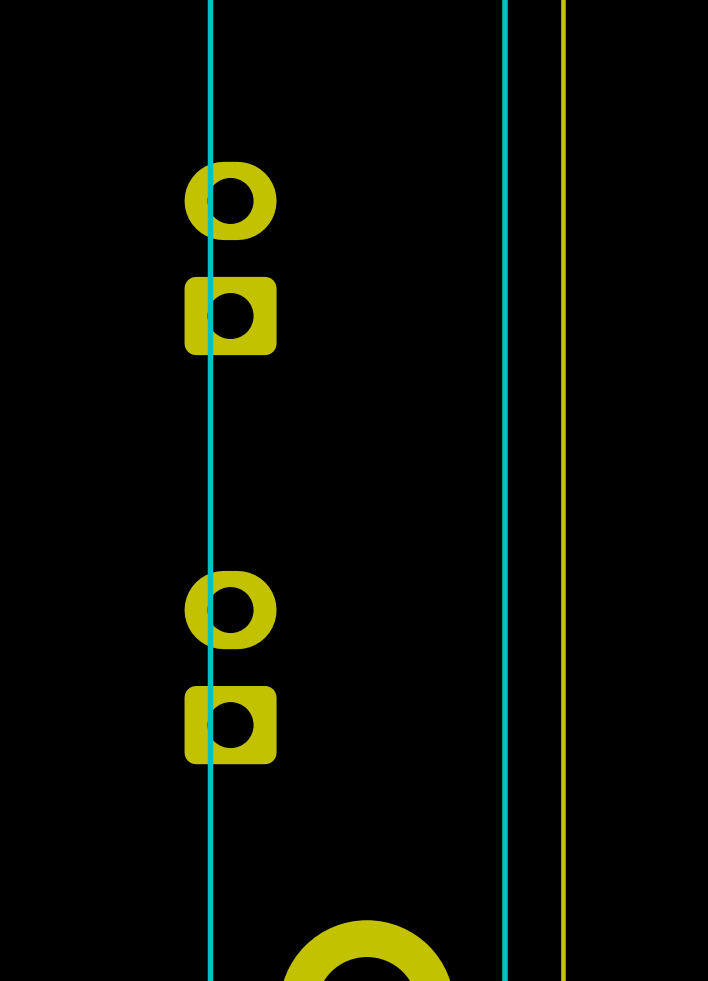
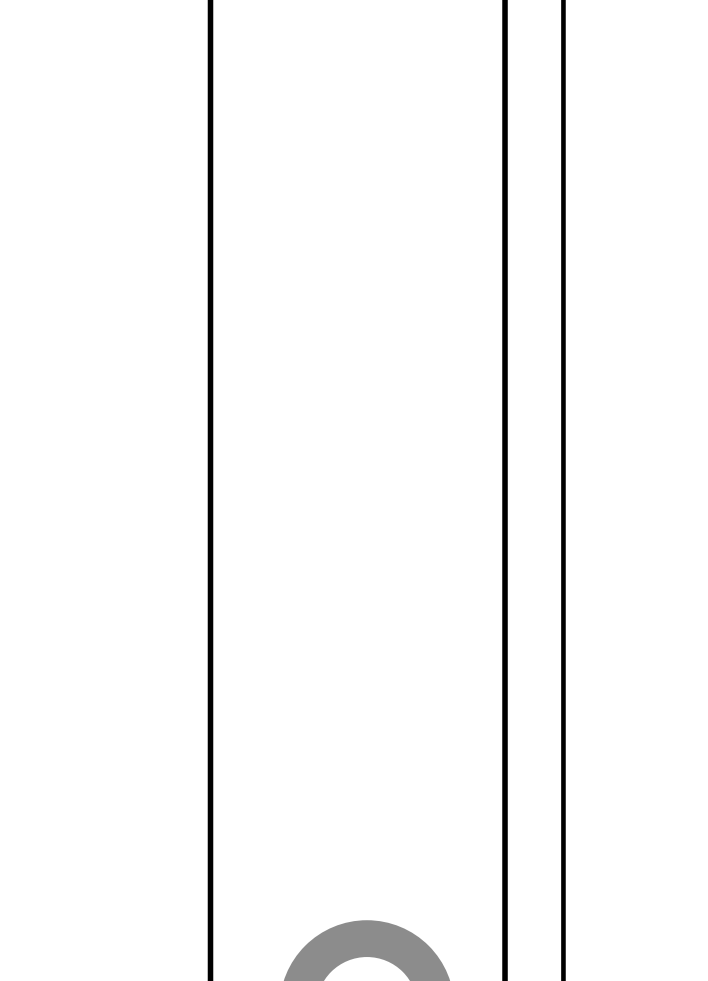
part: (230, 258) -> none
part: (230, 667) -> none

